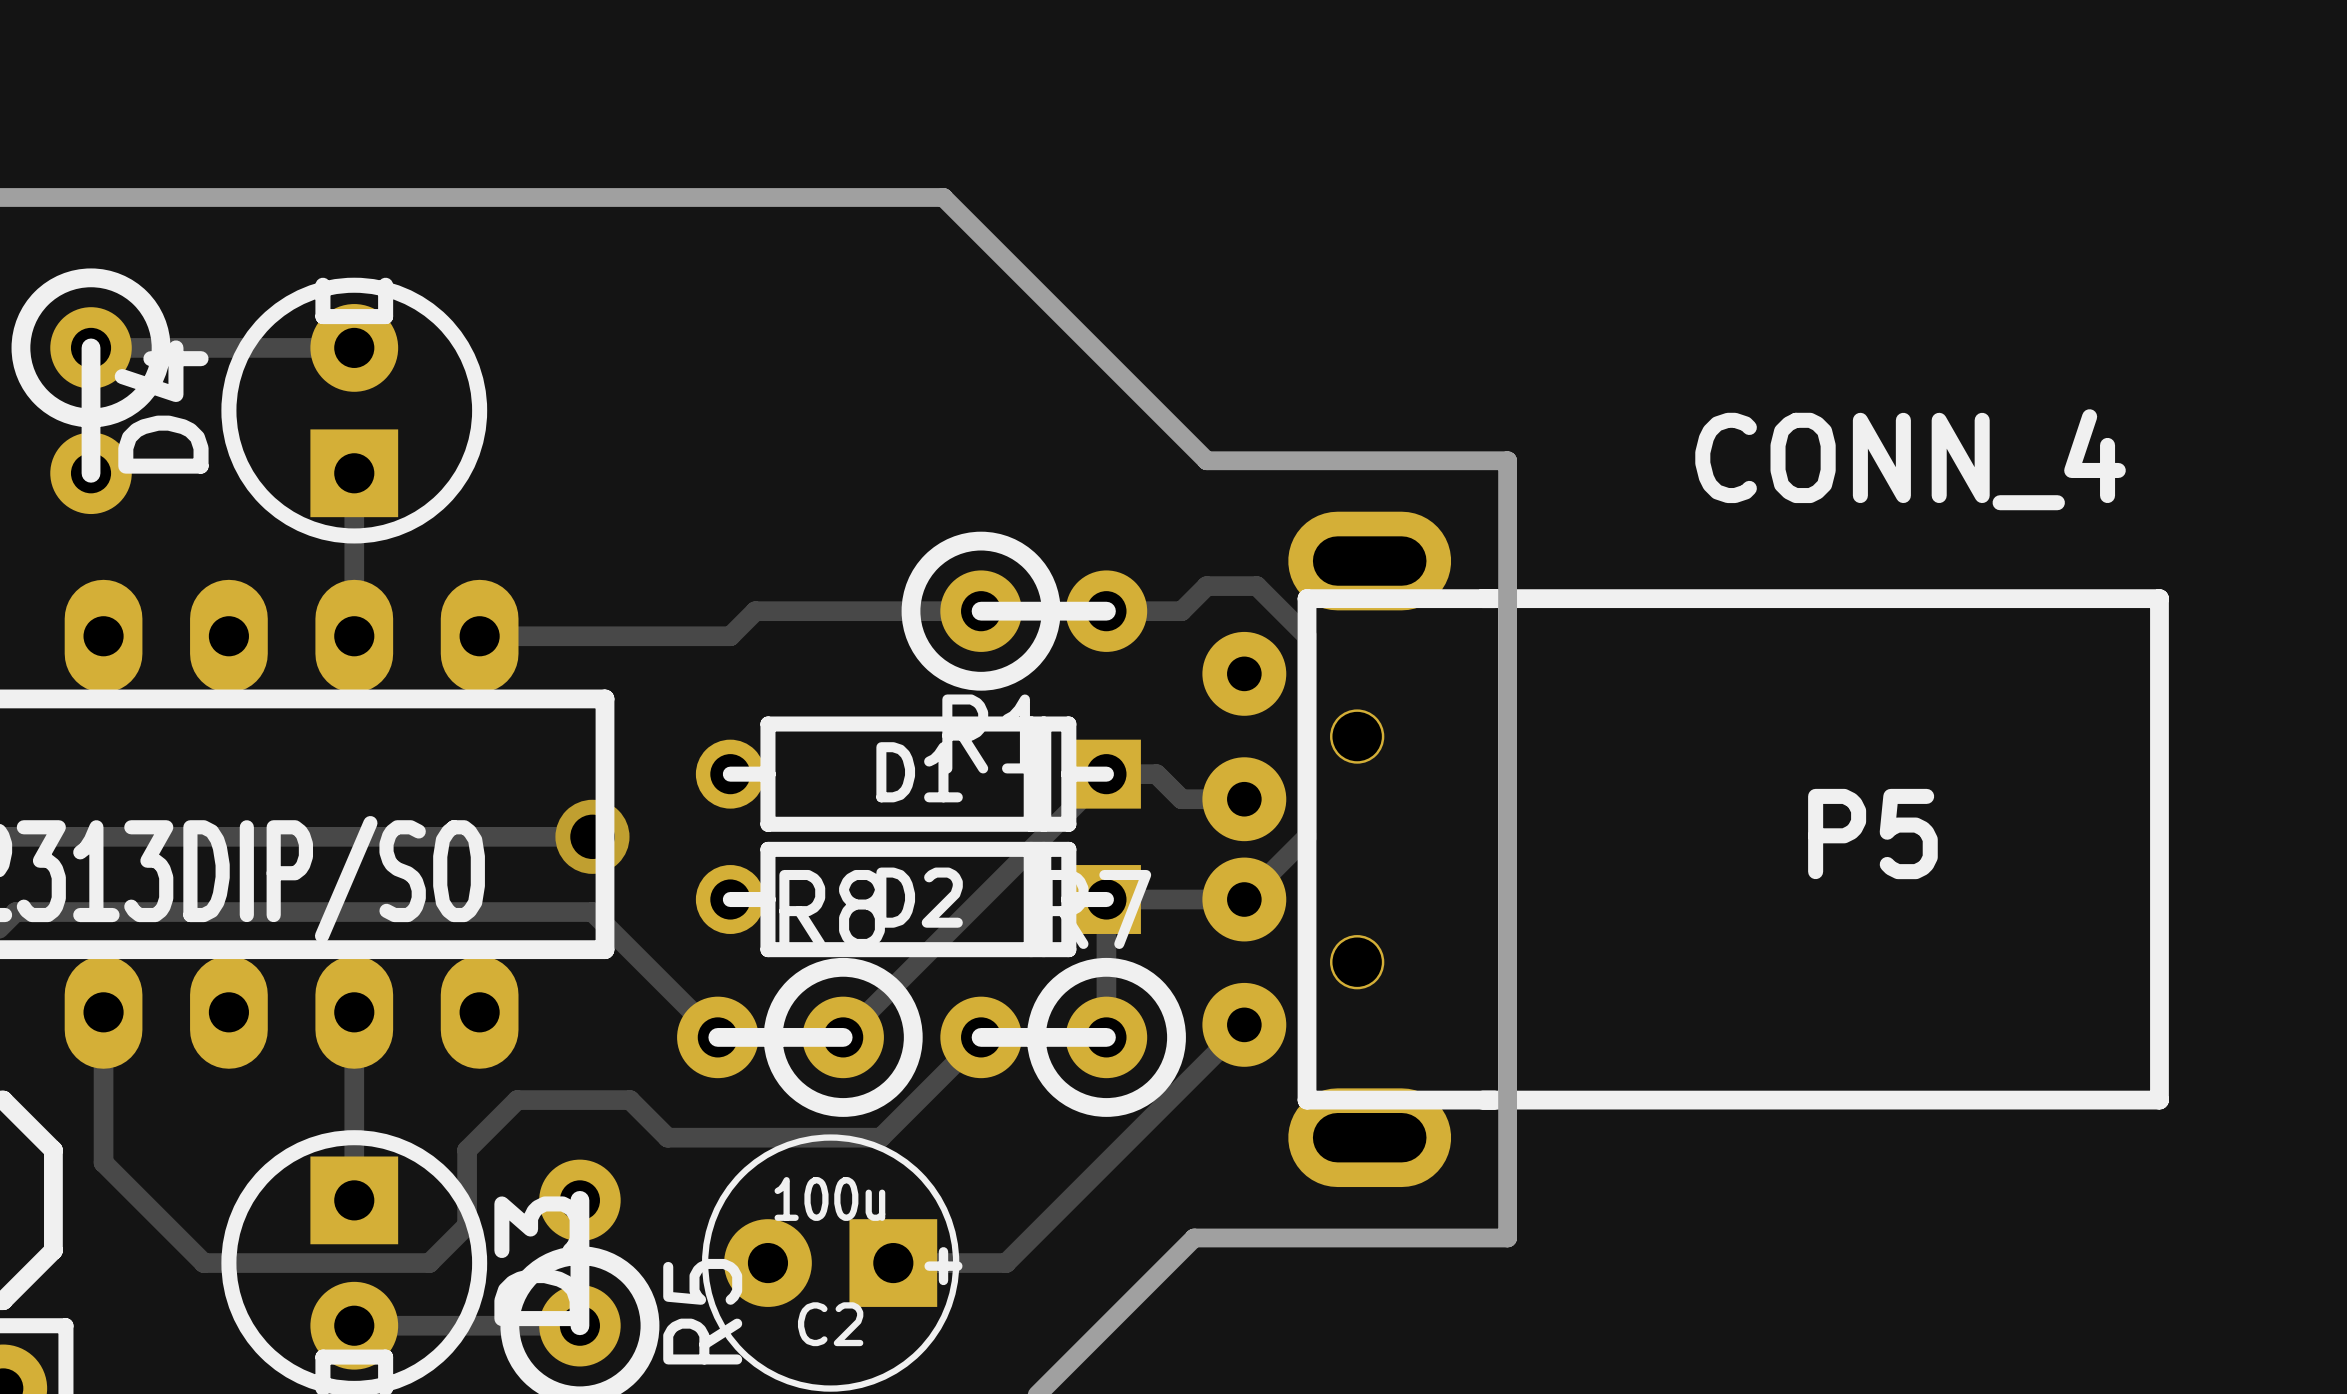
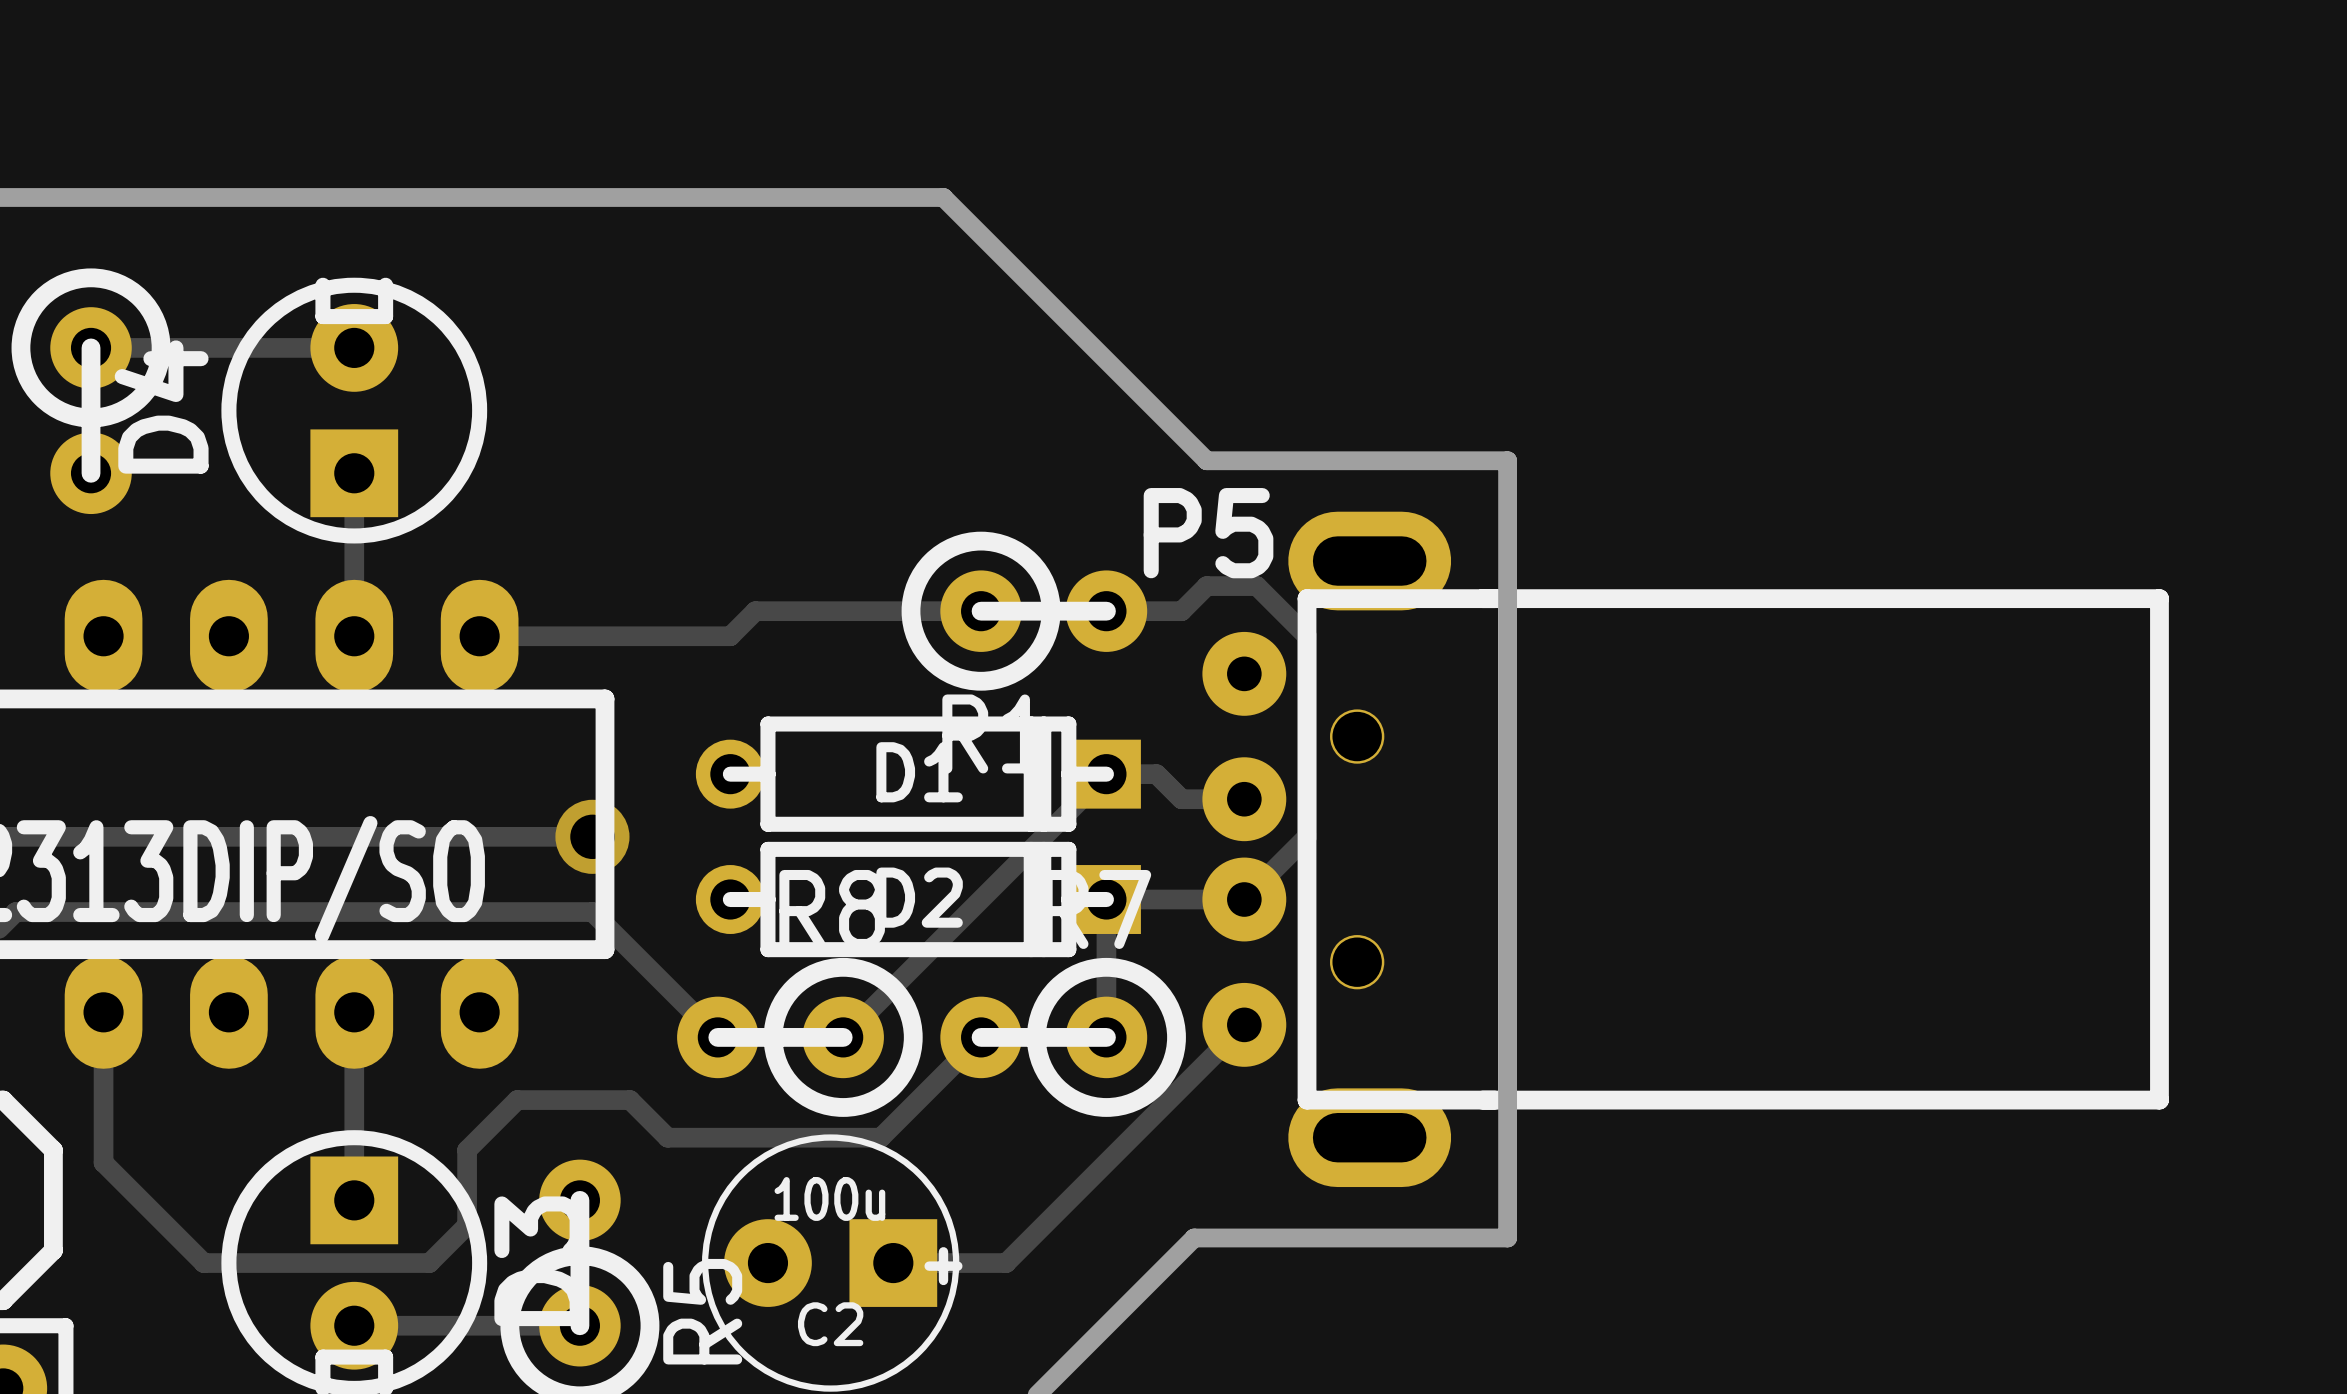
P5 value: CONN_4 (1910, 459) -> none
P5 name position: P5 (1872, 834) -> P5 (1208, 533)

